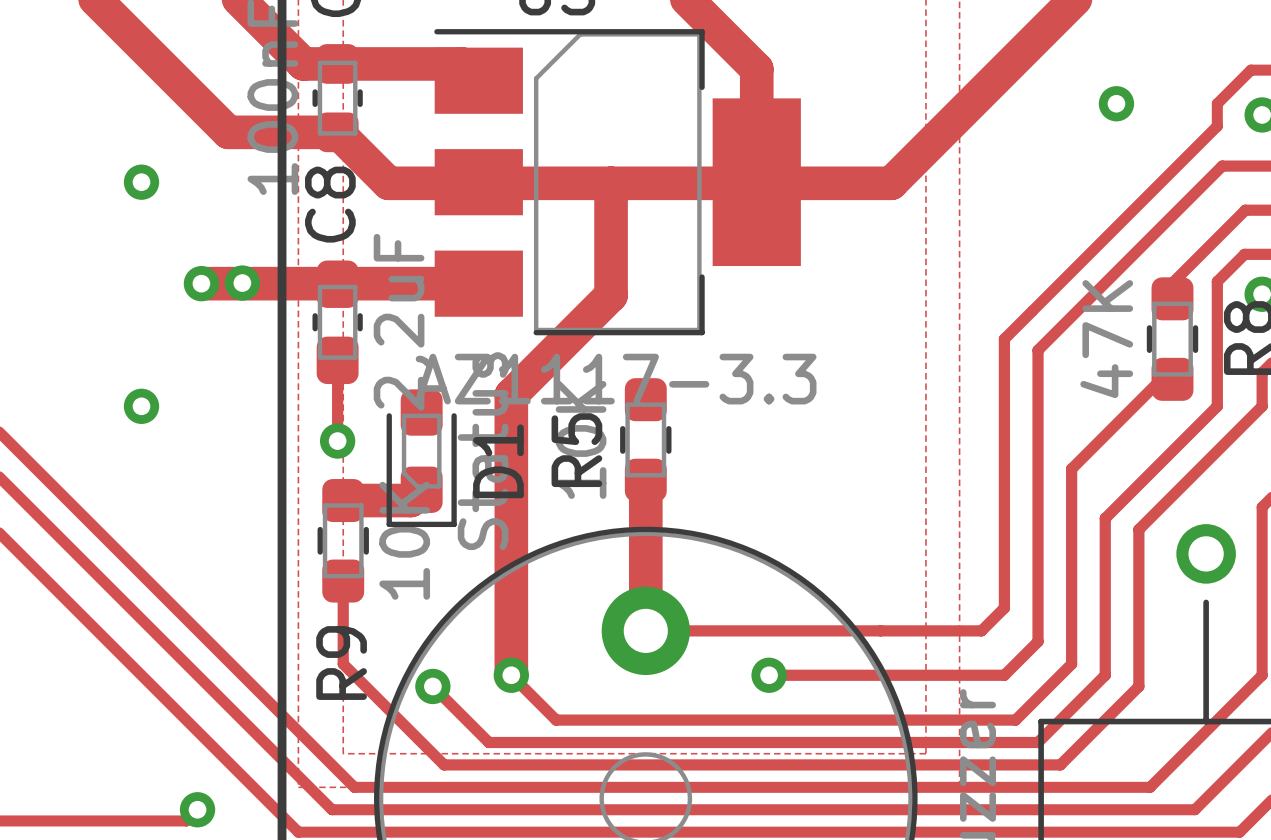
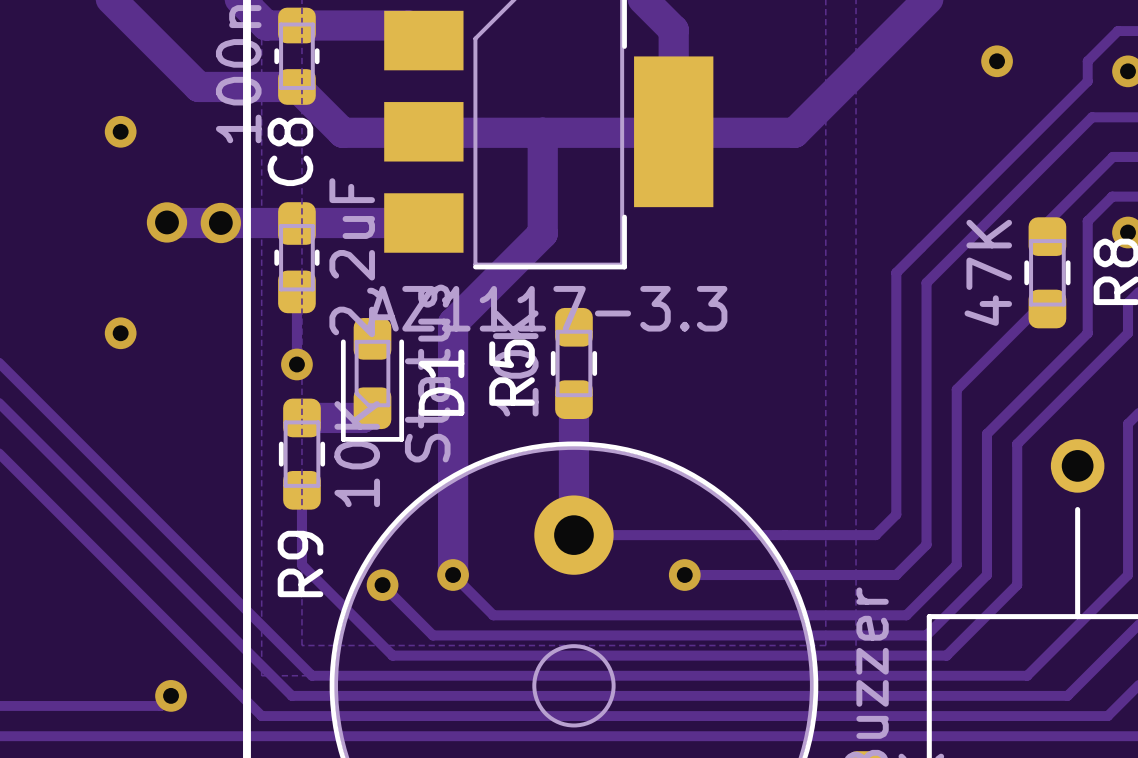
via size: [224, 265, 261, 301] -> [200, 202, 241, 244]
via size: [183, 266, 220, 302] -> [146, 202, 188, 243]

